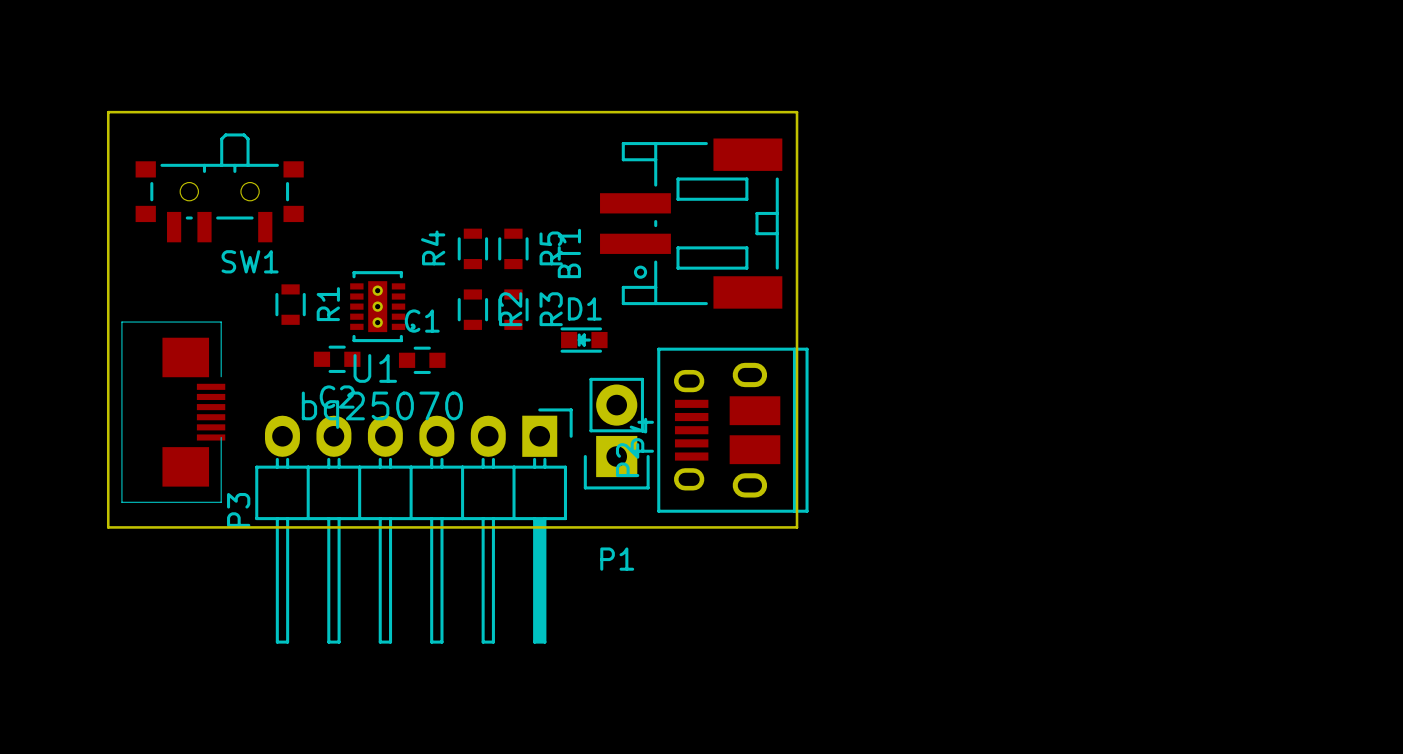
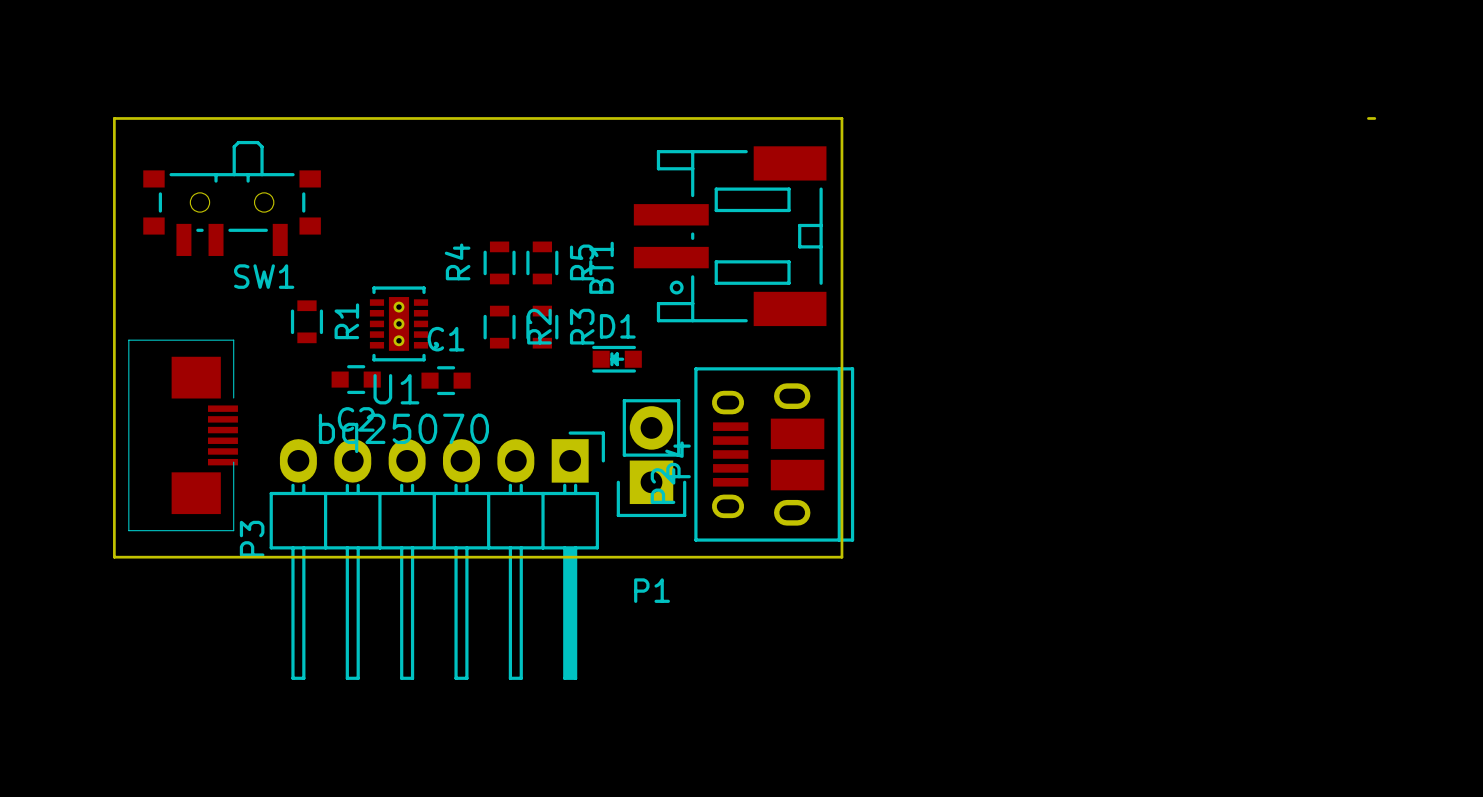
board edge: none -> (1368, 118) (1374, 118)

